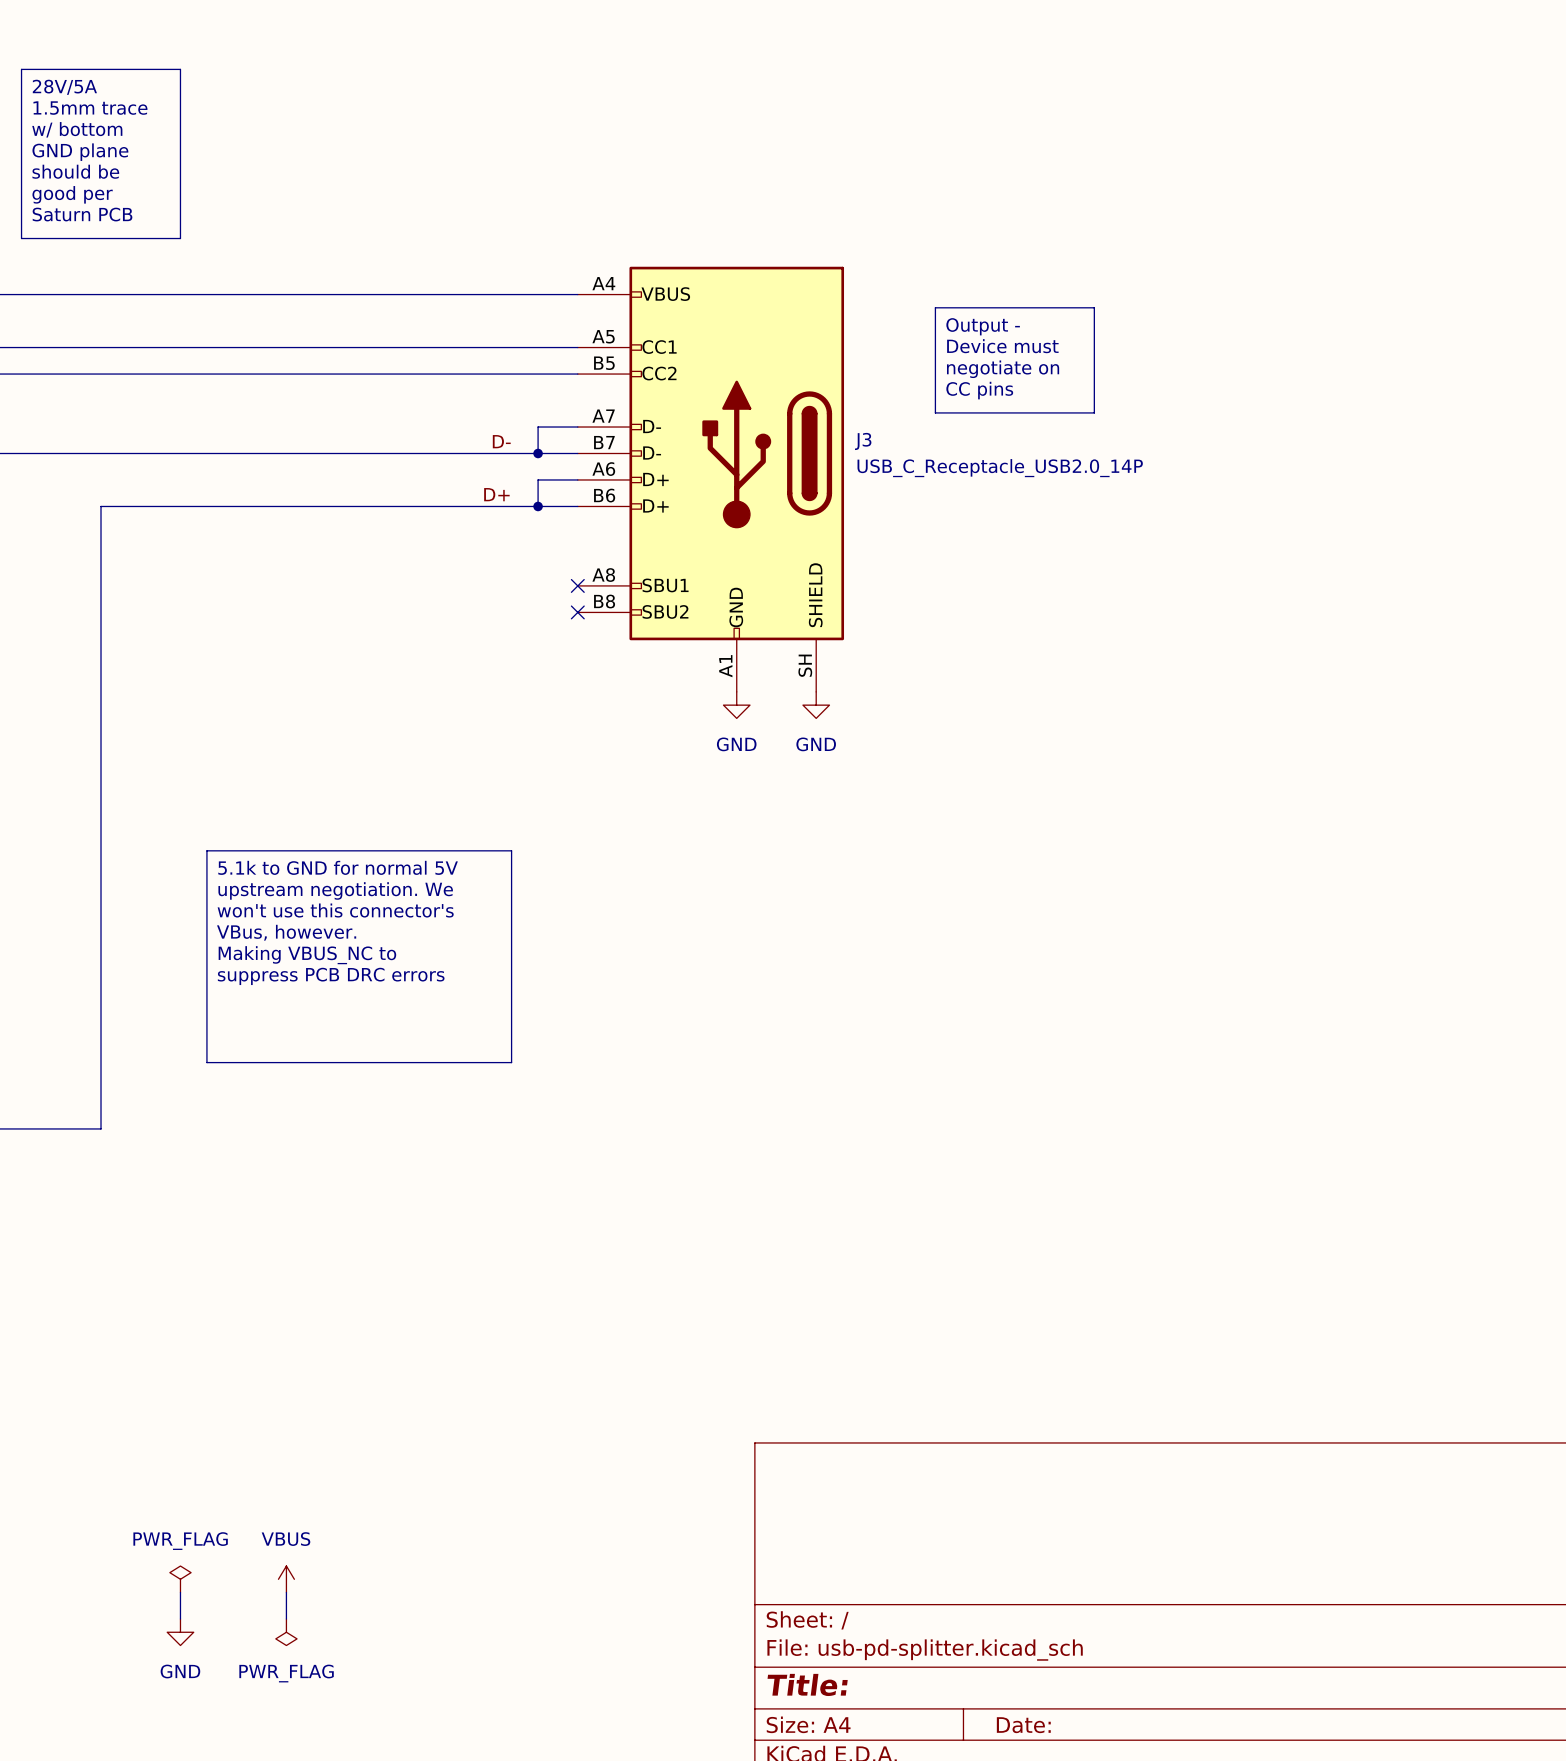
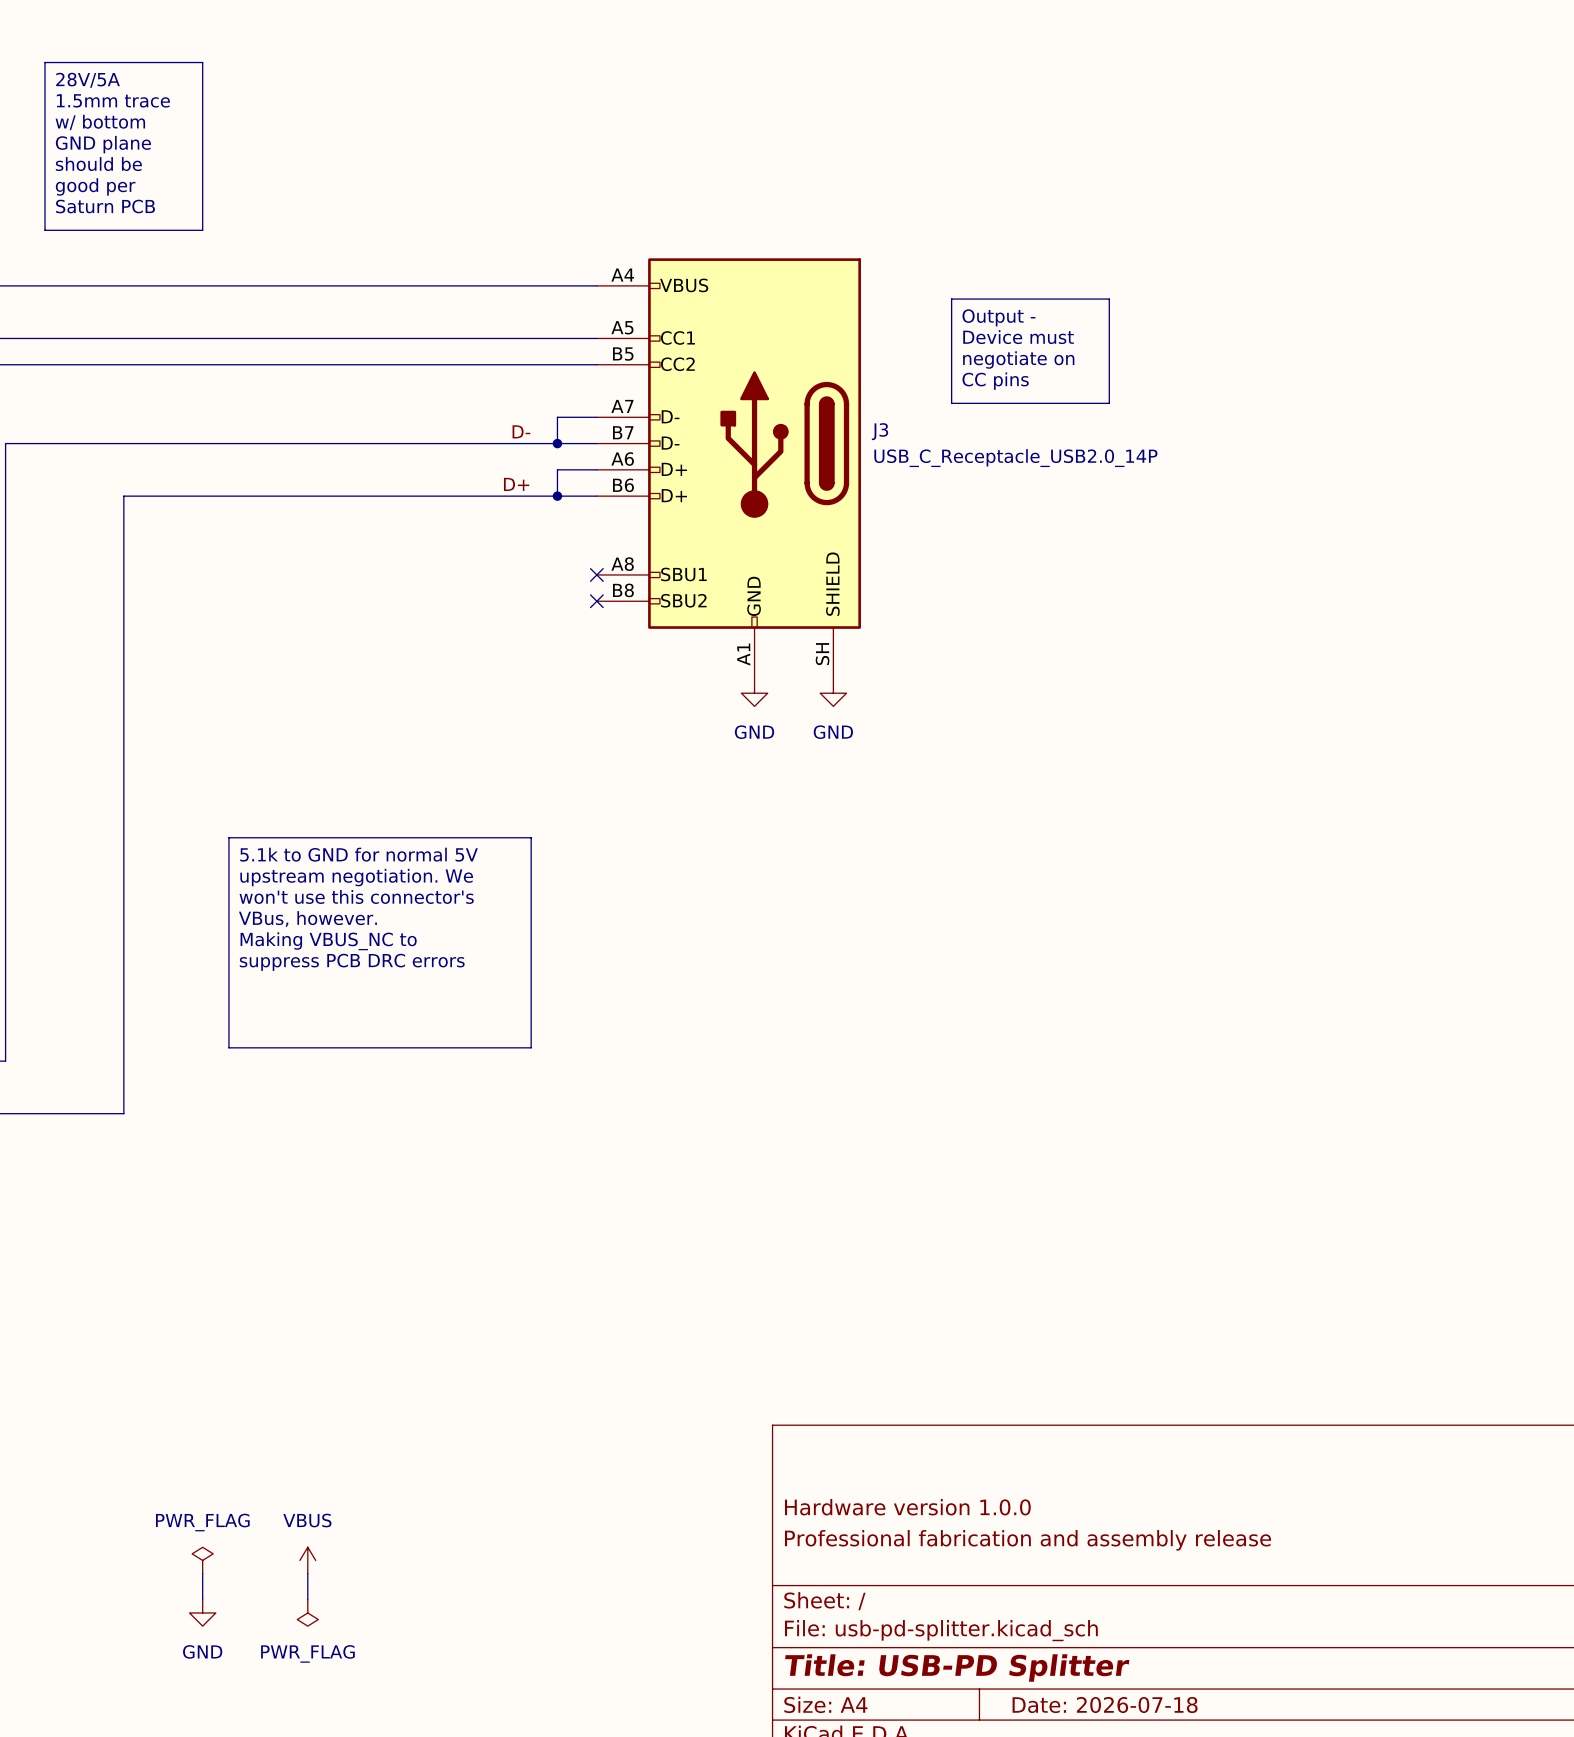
title block: none -> Hardware version 1.0.0 (907, 1507)
title block: none -> Professional fabrication and assembly release (1028, 1540)
title block: Title: (807, 1684) -> Title: USB-PD Splitter (957, 1668)
title block: Date: (1023, 1725) -> Date: 2026-07-18 (1105, 1705)

